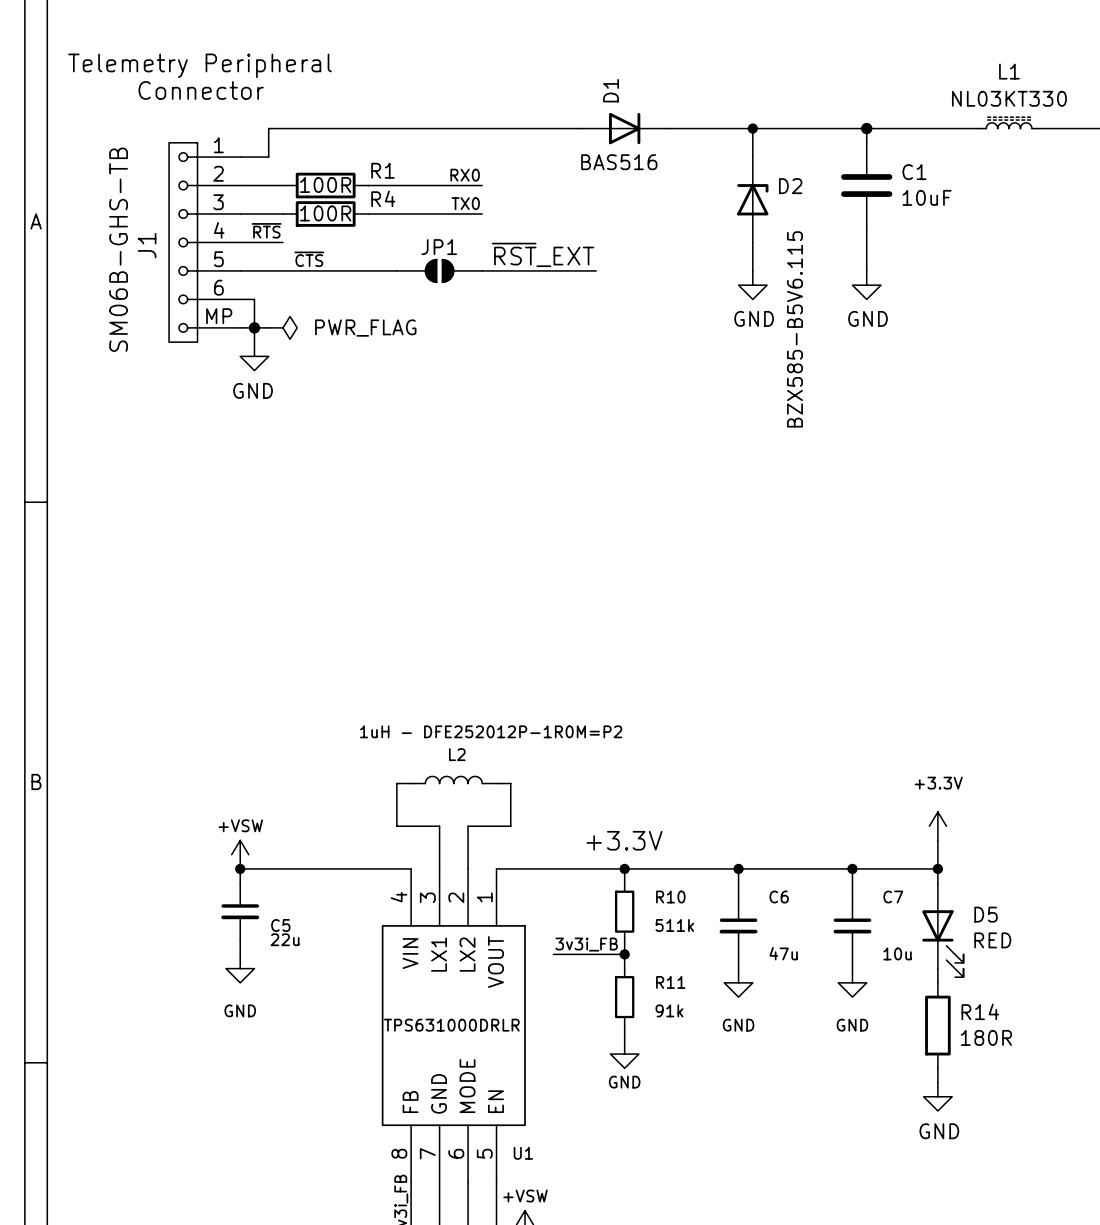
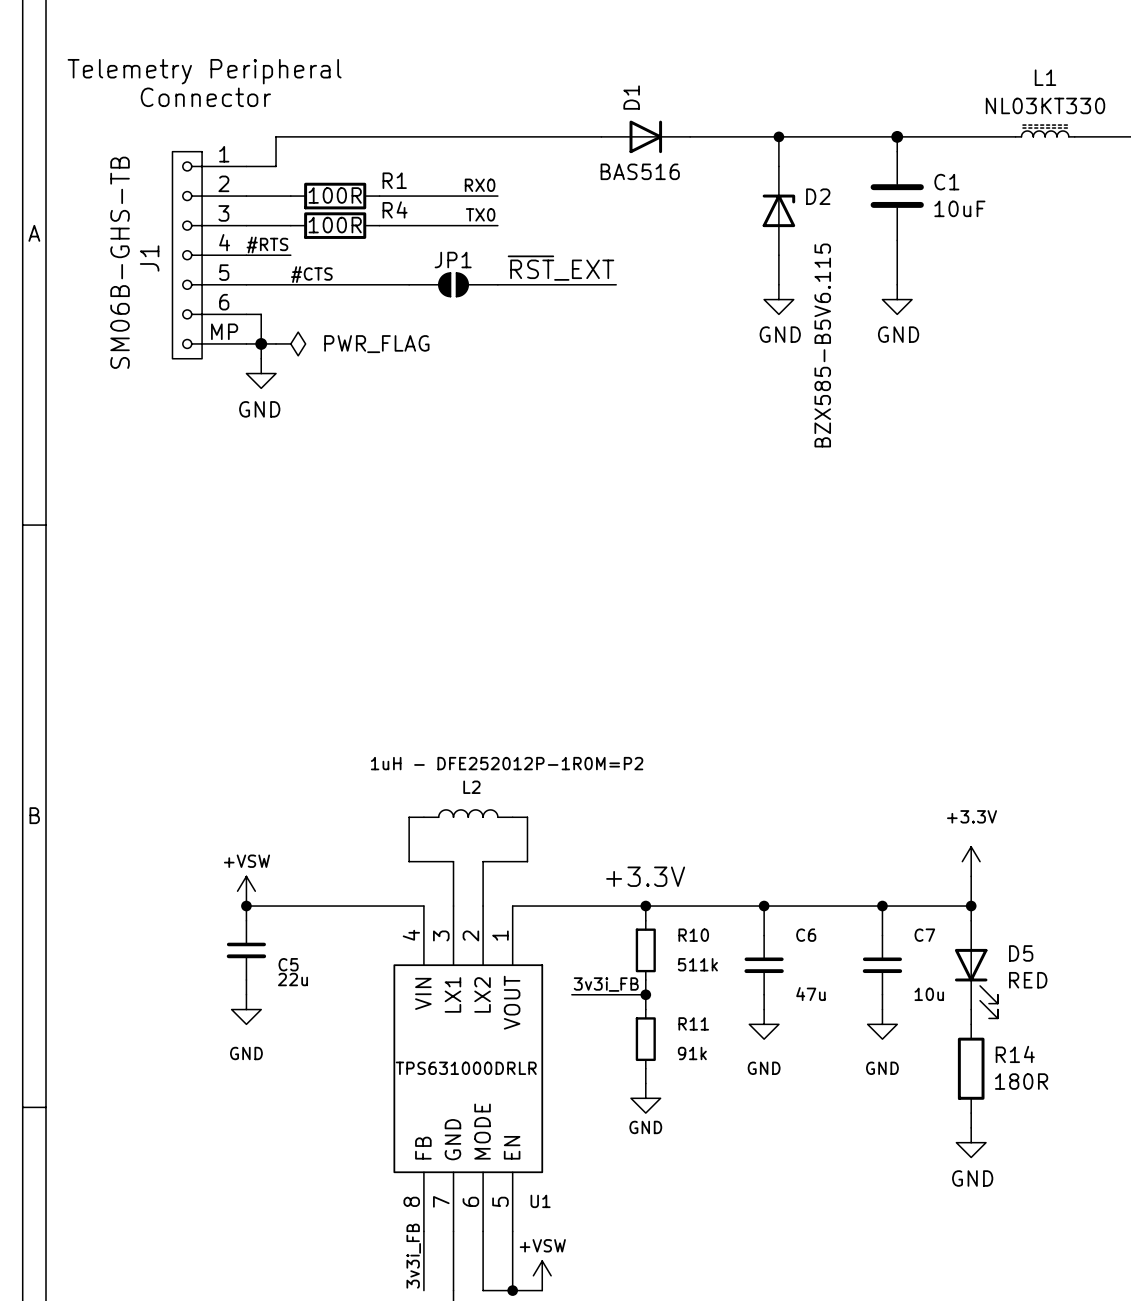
label: ~{RTS} (266, 230) -> #RTS (267, 245)
label: ~{CTS} (309, 259) -> #CTS (311, 274)

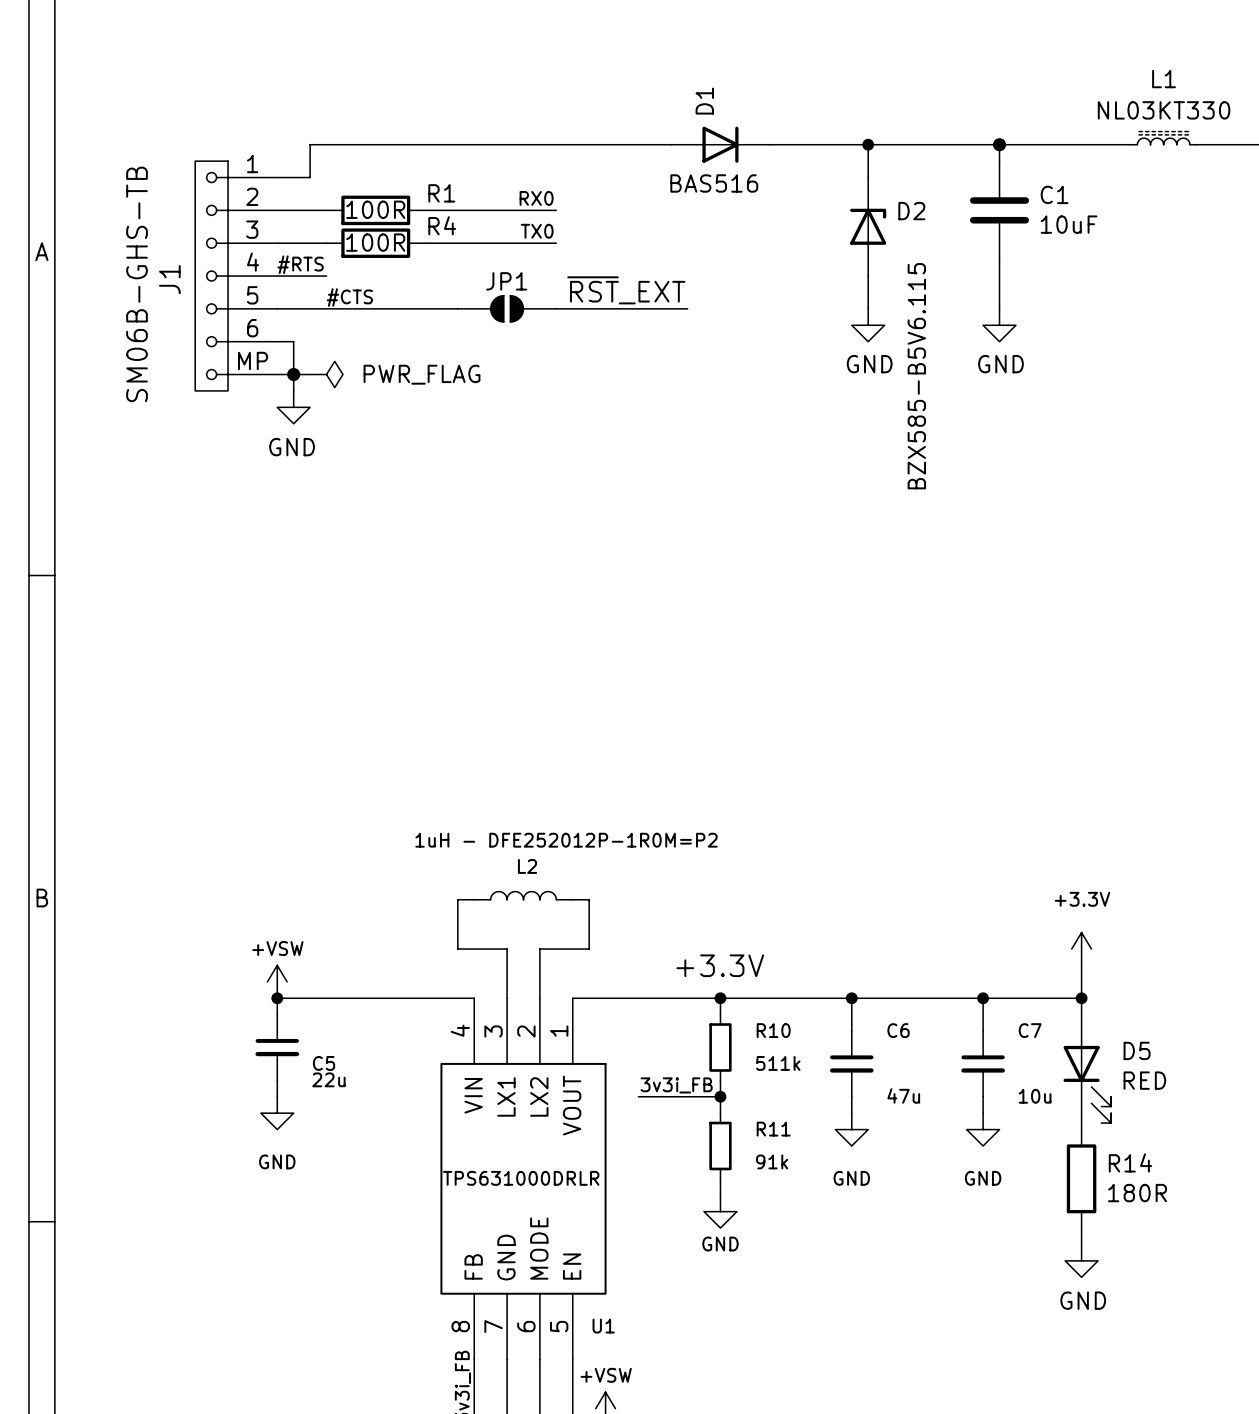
text: Telemetry Peripheral (204, 71) -> none
text: Connector (205, 97) -> none

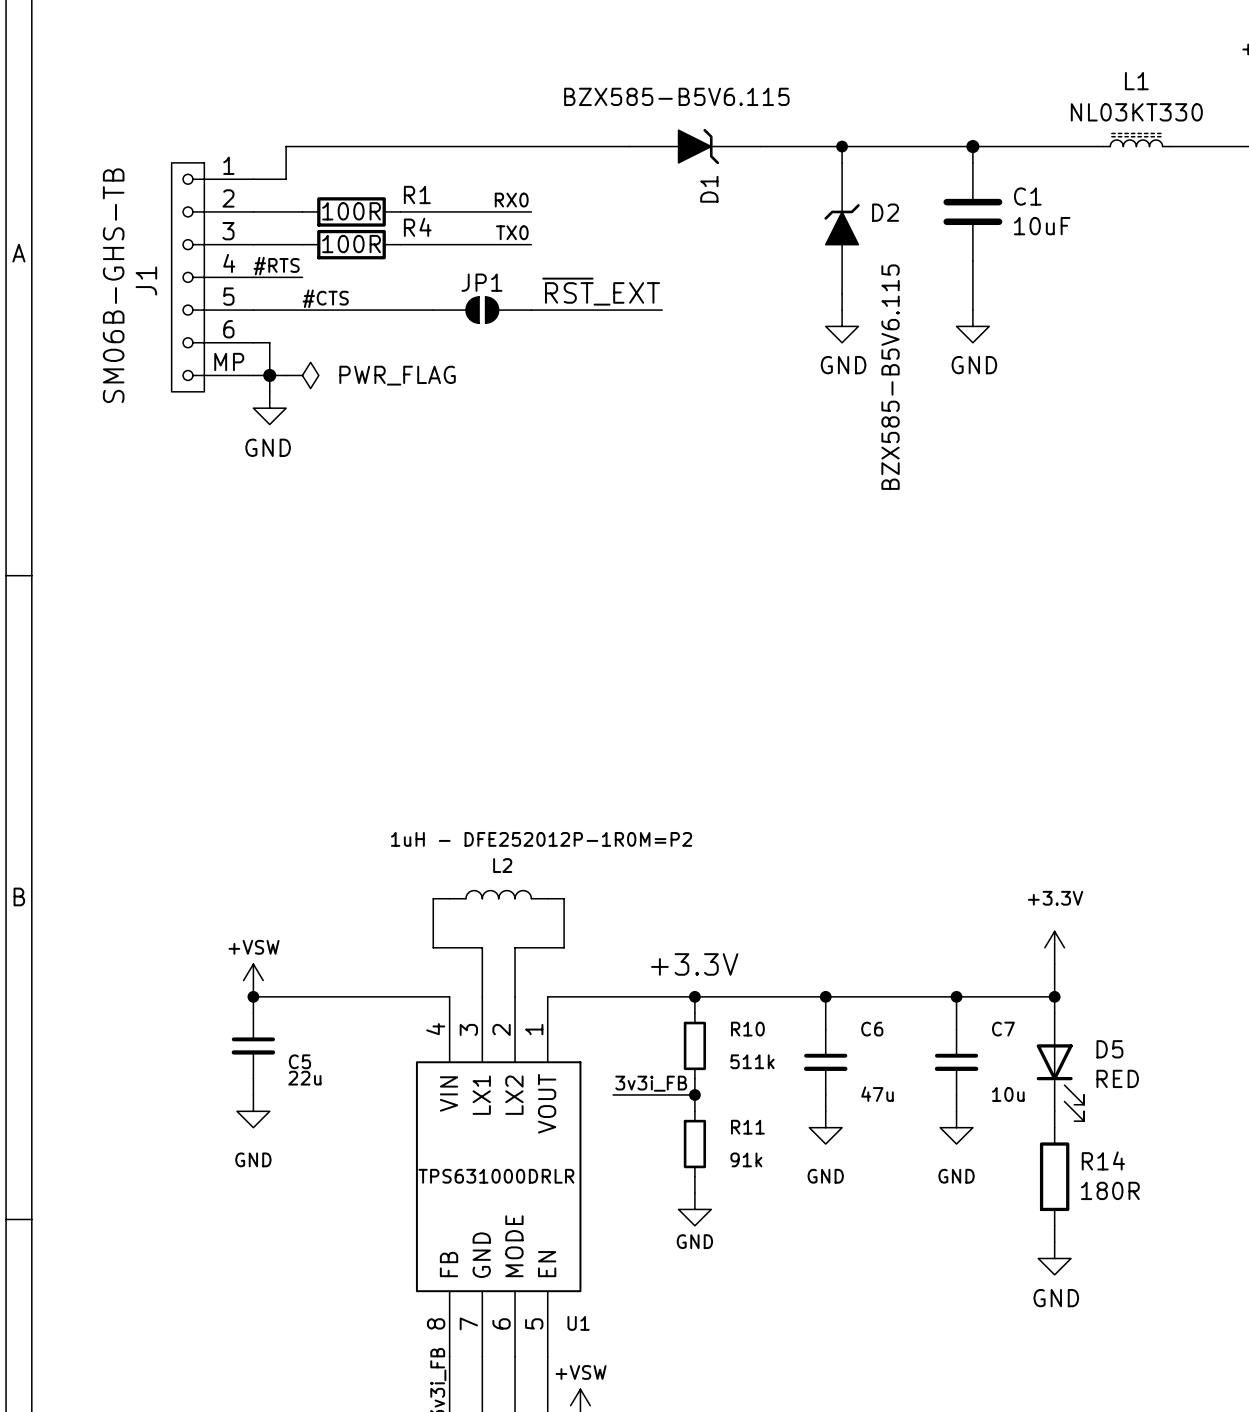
D1 name position: D1 (704, 101) -> D1 (709, 189)
D1 symbol: [671, 126, 770, 163] -> [629, 128, 761, 165]
D2 symbol: [850, 177, 887, 277] -> [824, 162, 860, 294]
D1 value: BAS516 (714, 183) -> BZX585-B5V6.115 (676, 96)

